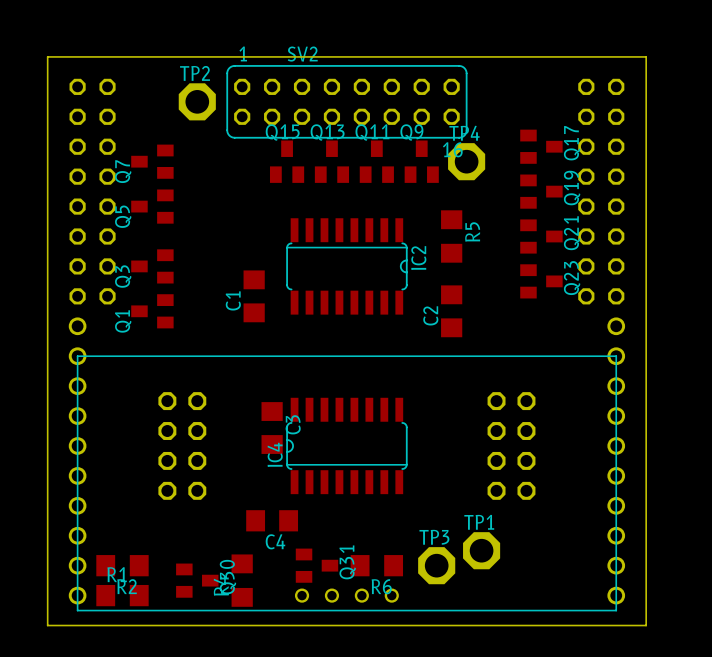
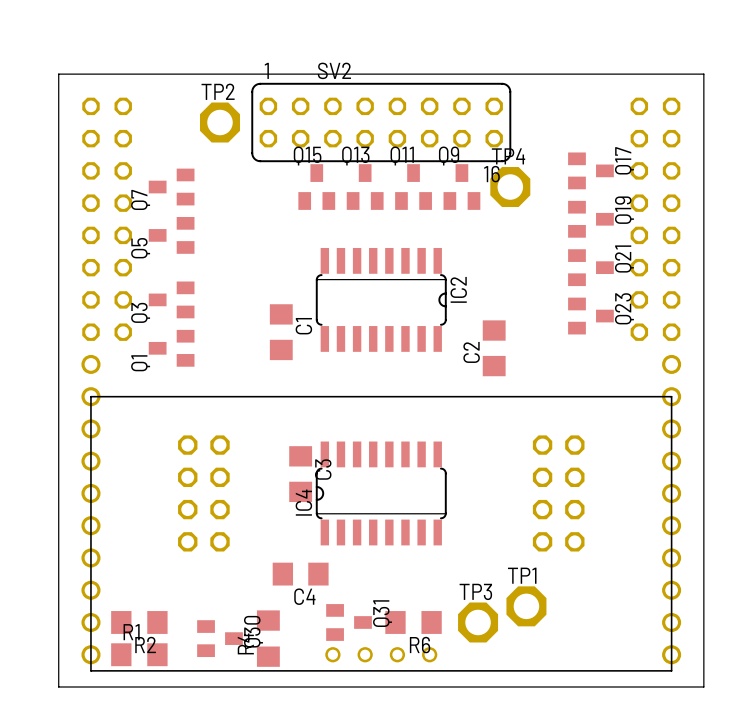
R5: (451, 236) -> none
C1 name position: C1 (233, 300) -> C1 (303, 326)

